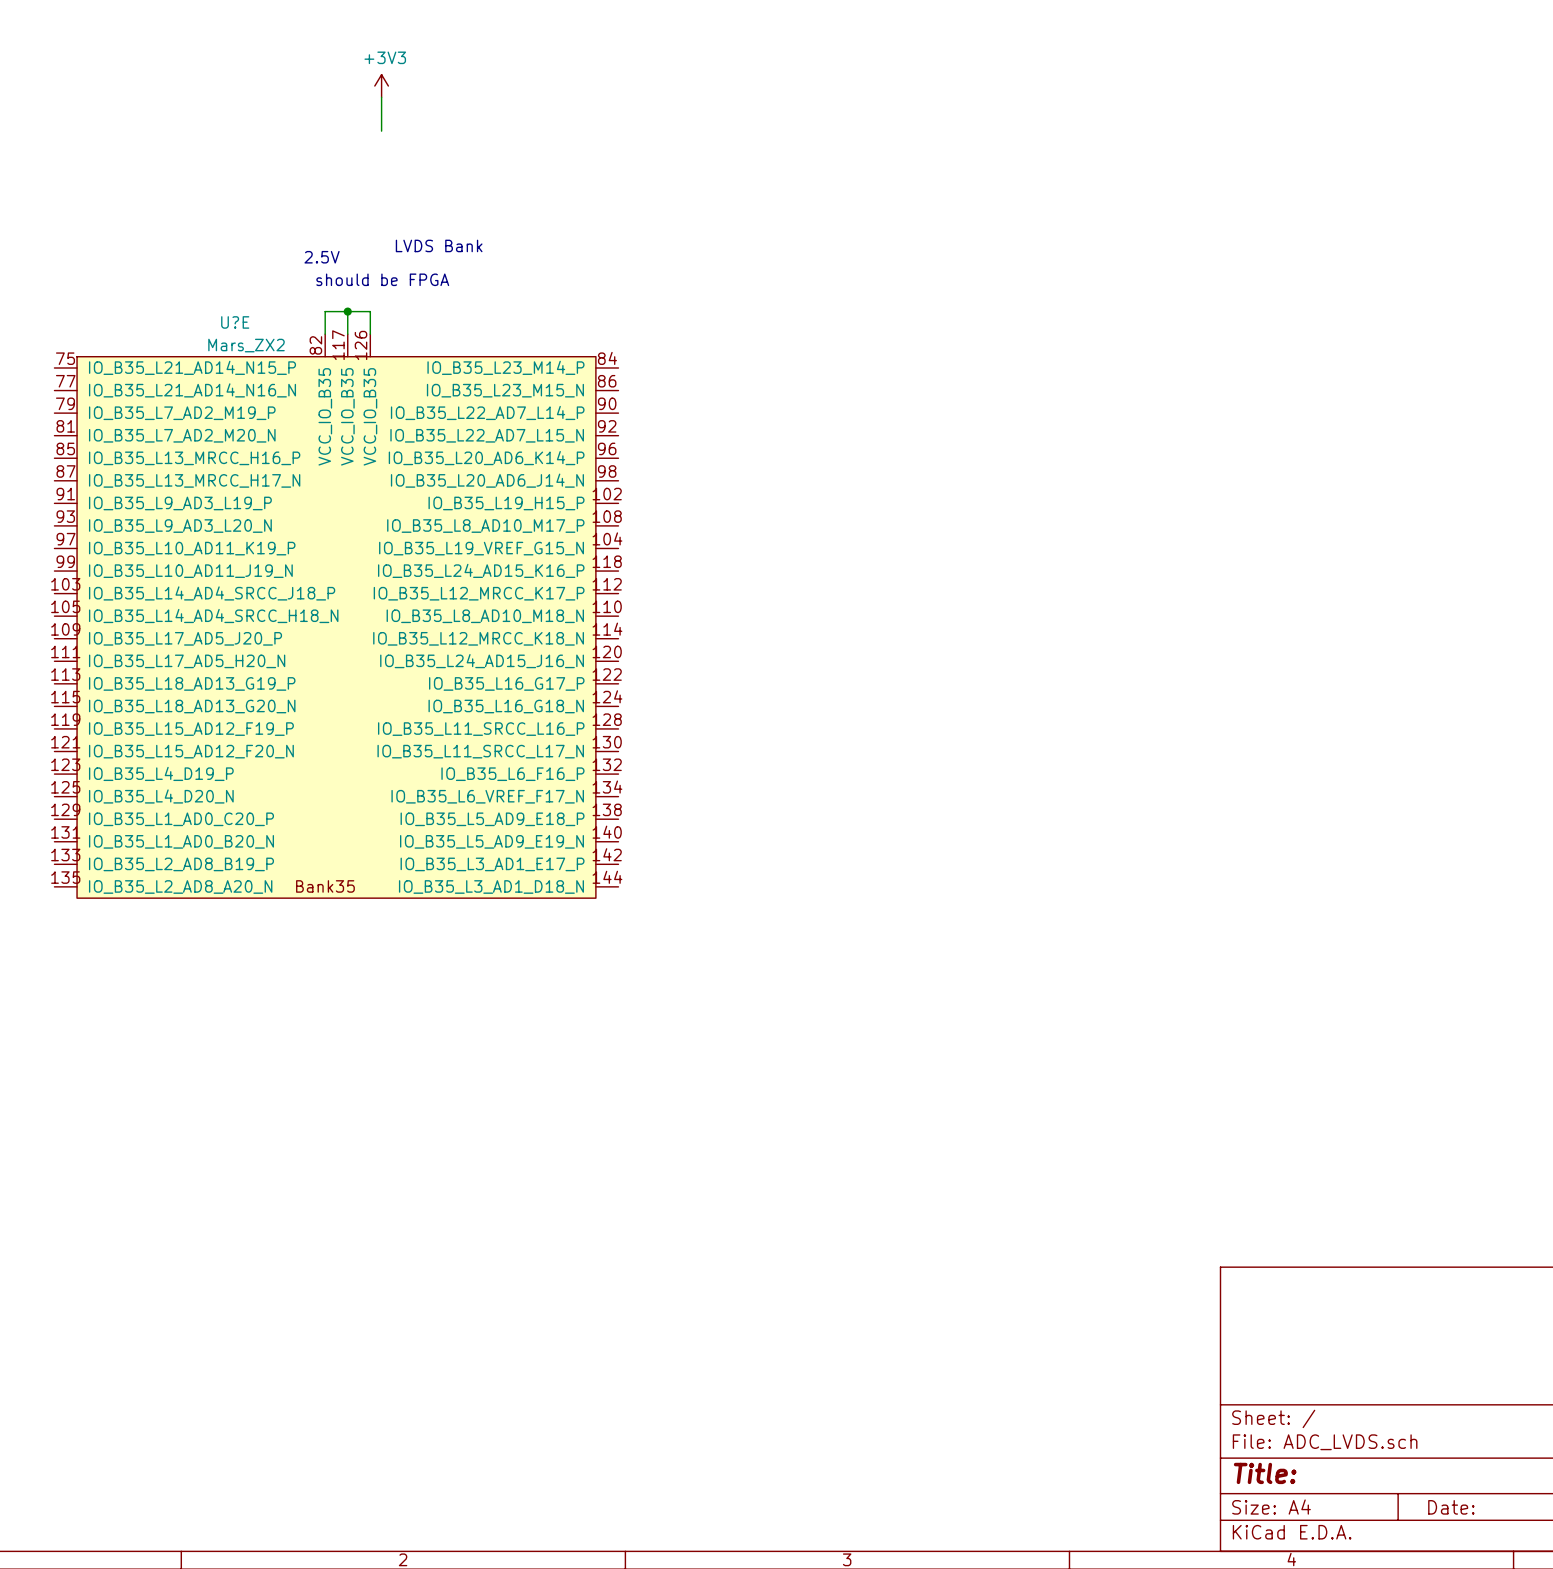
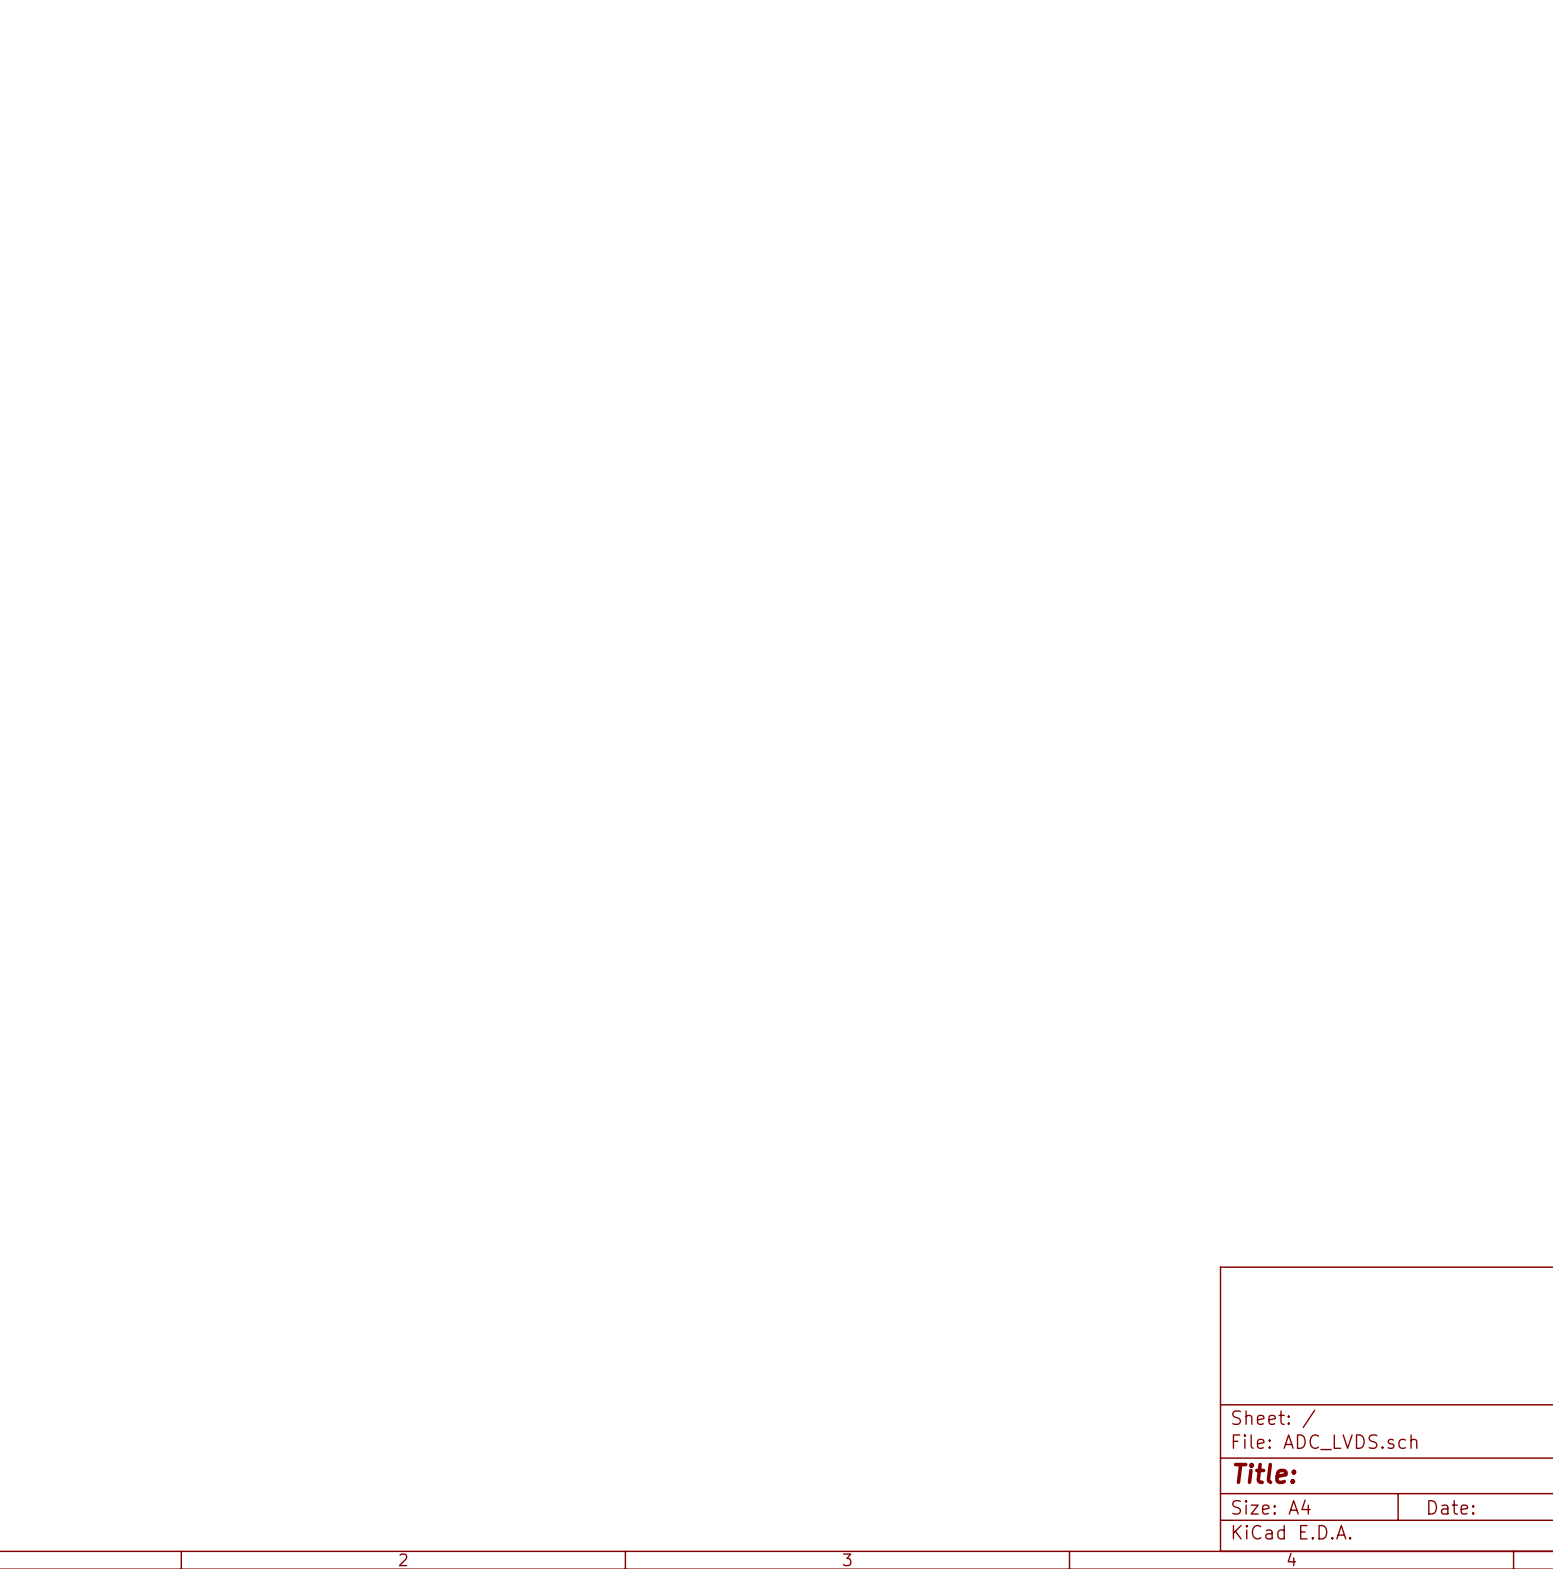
power symbol: +3V3 (381, 86) -> none
wire: (381, 97) (381, 131) -> none
text: LVDS Bank (439, 245) -> none
text: 2.5V (322, 257) -> none
text: should be FPGA (382, 279) -> none
wire: (347, 311) (347, 334) -> none
junction: (347, 311) -> none
wire: (325, 334) (325, 311) (370, 311) (370, 334) -> none
U?E: Mars_ZX2 (336, 616) -> none

